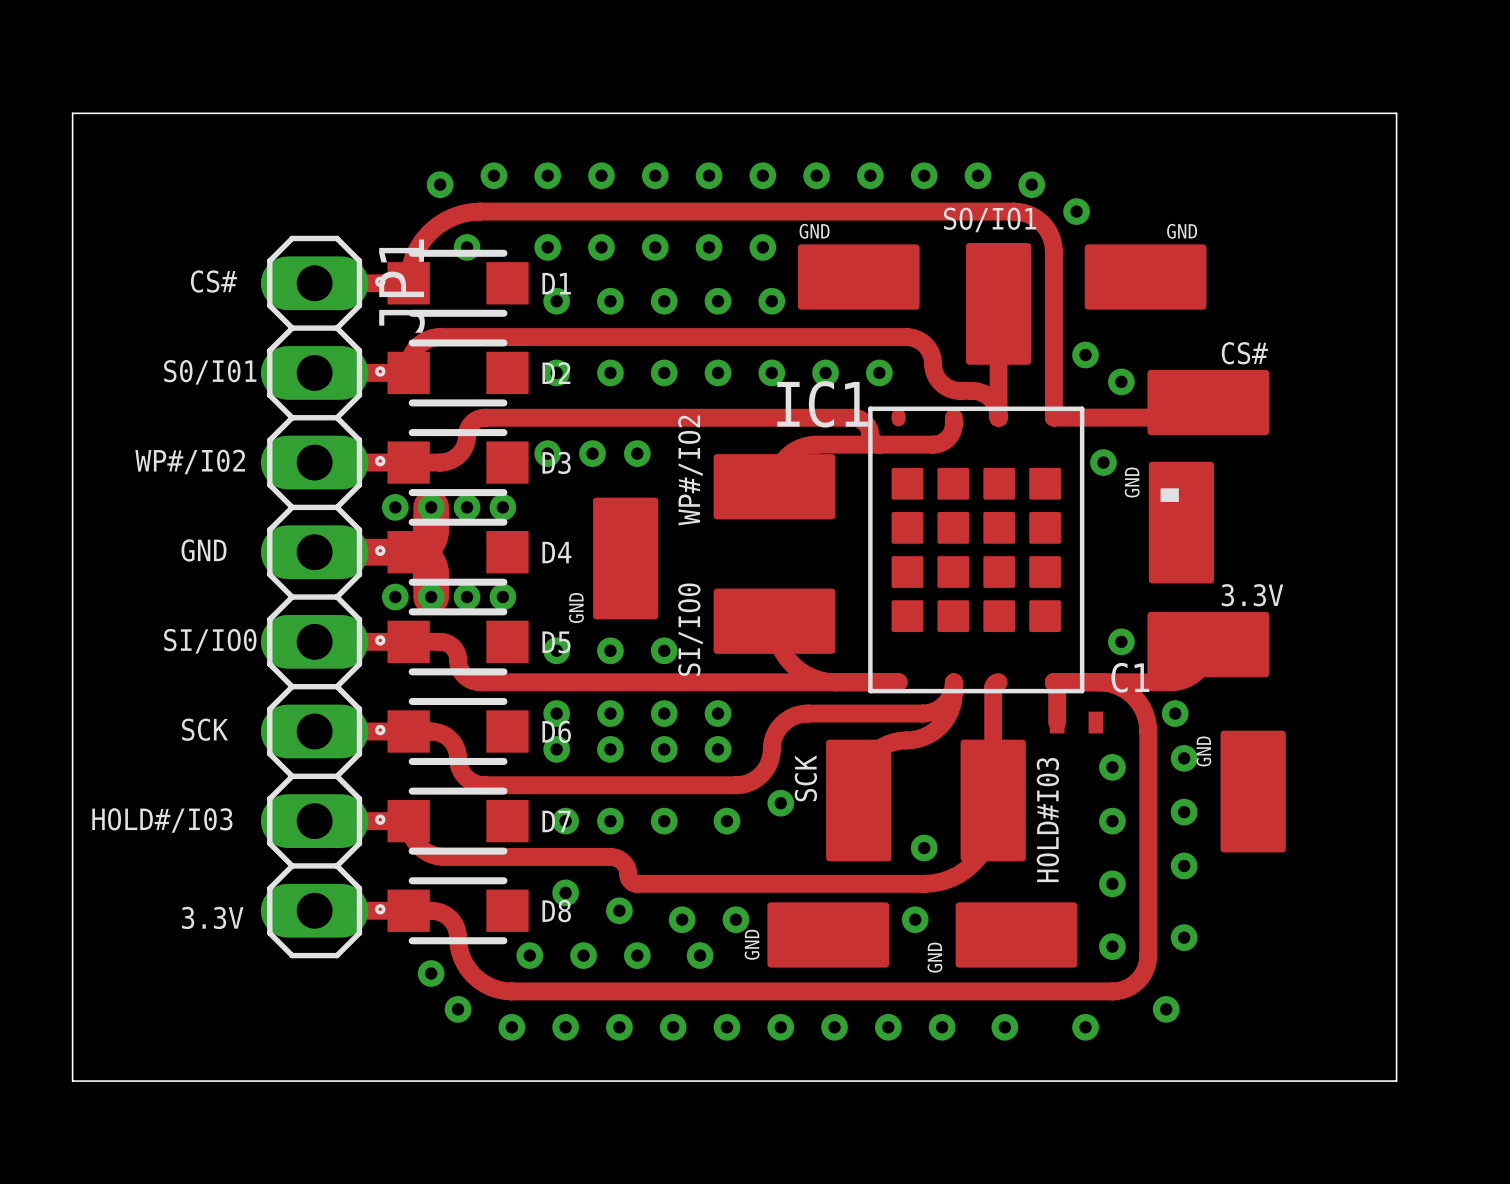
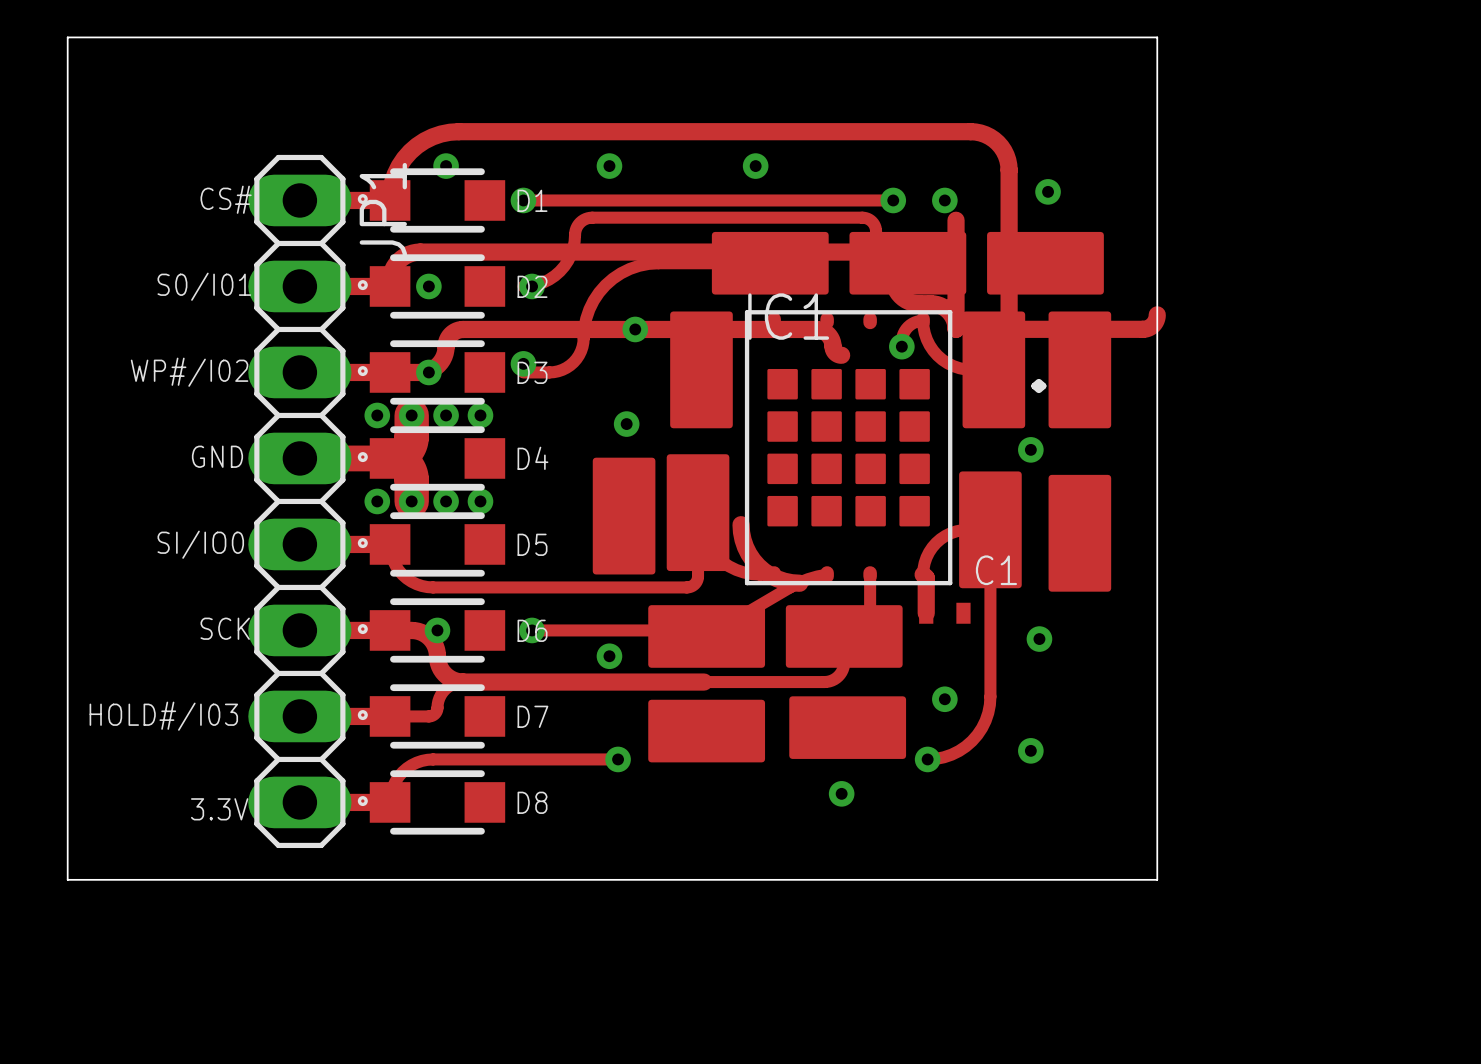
board edge: (1208, 113) (1396, 113) (1396, 1081) (72, 1081) (72, 991) -> (1157, 37) (1157, 879) (67, 879)
via: (493, 175) -> none
via: (547, 175) -> none
via: (601, 175) -> none
via: (655, 175) -> none
via: (709, 175) -> none
via: (762, 175) -> none
via: (816, 175) -> none
via: (870, 175) -> none
via: (924, 175) -> none
via: (977, 175) -> none
via: (440, 184) -> none
via: (1031, 184) -> none
via: (1076, 211) -> none
text: SO/IO1 (990, 219) -> none
text: GND (814, 231) -> none
text: GND (1182, 231) -> none
via: (547, 247) -> none
via: (601, 247) -> none
via position: (655, 247) -> (609, 166)
via: (709, 247) -> none
via position: (762, 247) -> (755, 166)
via: none -> (1048, 191)
part: (858, 277) -> none
part: (1145, 277) -> none
text position: CS# (214, 281) -> CS# (226, 199)
track: none -> (523, 200) (893, 200)
via: none -> (893, 200)
via: none -> (944, 200)
via position: (556, 301) -> (523, 200)
via: (610, 301) -> none
via: (664, 301) -> none
via: (718, 301) -> none
via: (771, 301) -> none
part: (998, 303) -> none
track: none -> (770, 263) (658, 263) (629, 268) (612, 278) (593, 300) (586, 318) (582, 346) (573, 362) (558, 371) (523, 372)
part: none -> (770, 263)
part: none -> (907, 263)
part: none -> (1045, 263)
text: CS# (1244, 353) -> none
via: (1085, 355) -> none
track: none -> (870, 275) (873, 270) (884, 269) (889, 263) (907, 263) (895, 260) (885, 253) (878, 243) (874, 224) (865, 218) (592, 217) (583, 219) (577, 226) (571, 254) (559, 271) (543, 282) (523, 286)
via: none -> (428, 286)
via: (610, 372) -> none
via: (664, 372) -> none
via: (718, 372) -> none
via: (771, 372) -> none
via: (825, 372) -> none
via: (879, 372) -> none
via: (1121, 381) -> none
part: (1208, 402) -> none
via: none -> (635, 329)
track: (953, 417) (953, 429) (949, 436) (943, 441) (935, 444) (816, 444) (800, 447) (783, 461) (775, 475) (774, 486) -> none
track: none -> (901, 346) (902, 336) (906, 329) (914, 322) (923, 320) (924, 333) (929, 345) (942, 359) (953, 366) (965, 369) (993, 369)
via: none -> (901, 346)
via: (592, 453) -> none
via: (637, 453) -> none
part: none -> (993, 369)
part: none -> (1079, 369)
via: none -> (428, 372)
via: (1103, 462) -> none
text: WP#/IO2 (690, 470) -> none
text: GND (1132, 482) -> none
part rotation: 0° (774, 486) -> 90° clockwise (701, 369)
via: none -> (626, 424)
part: (1181, 522) -> none
via: none -> (1030, 449)
IC1 position: (976, 549) -> (848, 447)
text position: GND (204, 550) -> GND (217, 456)
part: (625, 558) -> none
text: 3.3V (1252, 595) -> none
text: GND (576, 608) -> none
part: none -> (624, 516)
part rotation: 0° (774, 621) -> 90° clockwise (698, 512)
part: none -> (990, 529)
text: SI/IO0 (690, 629) -> none
part: none -> (1079, 533)
track: (408, 641) (440, 641) (449, 644) (456, 652) (458, 665) (462, 673) (469, 679) (477, 682) (898, 682) -> (390, 544) (391, 555) (398, 570) (411, 581) (427, 587) (688, 587) (694, 584) (697, 577) (698, 512) (702, 536) (710, 550) (722, 561) (744, 572) (774, 574)
via: (1121, 641) -> none
track: (1208, 644) (1205, 658) (1200, 667) (1193, 674) (1180, 681) (1053, 682) -> none
part: (1208, 644) -> none
via: (556, 650) -> none
via: (610, 650) -> none
via: (664, 650) -> none
track: none -> (827, 574) (798, 582) (706, 636) (704, 632) (700, 630) (532, 630)
track: (998, 682) (994, 683) (993, 687) (993, 814) (990, 832) (983, 849) (972, 863) (958, 874) (942, 881) (924, 883) (636, 883) (629, 879) (624, 863) (612, 857) (435, 855) (426, 852) (416, 842) (411, 834) (408, 821) -> (463, 682) (453, 684) (445, 689) (439, 697) (436, 711) (432, 715) (390, 716)
track: (1099, 682) (1117, 686) (1133, 696) (1144, 712) (1147, 725) (1147, 960) (1145, 969) (1137, 980) (1121, 990) (504, 990) (484, 984) (469, 970) (459, 951) (456, 927) (447, 916) (434, 910) (408, 910) -> (618, 759) (427, 759) (411, 765) (398, 776) (391, 791) (390, 802)
track: (1057, 685) (1057, 722) -> none
via: (556, 713) -> none
via: (610, 713) -> none
via: (664, 713) -> none
via: (718, 713) -> none
via: (1175, 713) -> none
track: none -> (927, 614) (926, 577) (923, 574) (923, 568) (926, 557) (932, 547) (940, 539) (956, 531) (990, 529) (990, 696) (988, 712) (977, 734) (965, 746) (951, 754) (927, 759)
C1 position: (1076, 722) -> (944, 613)
text position: SCK (205, 729) -> SCK (225, 628)
via: none -> (437, 630)
via: none -> (532, 630)
part: none -> (706, 636)
part: none -> (844, 636)
via: (556, 749) -> none
via: (610, 749) -> none
via: (664, 749) -> none
via: (718, 749) -> none
text: GND (1203, 751) -> none
via: none -> (609, 656)
via: (1184, 758) -> none
via position: (1112, 767) -> (1039, 639)
text: SCK (805, 778) -> none
track: (735, 785) (749, 782) (764, 771) (770, 758) (773, 740) (776, 731) (785, 720) (793, 716) (807, 713) (930, 712) (941, 707) (947, 701) (951, 694) (953, 682) (952, 705) (947, 716) (939, 726) (930, 734) (918, 738) (888, 744) (877, 750) (868, 759) (860, 775) (858, 800) -> (704, 682) (824, 682) (834, 679) (840, 674) (843, 667) (844, 636) (859, 631) (868, 620) (870, 610) (870, 574)
part: (1253, 791) -> none
part: (858, 800) -> none
part: (993, 800) -> none
via: (780, 803) -> none
via: none -> (944, 699)
via: (1184, 812) -> none
text: HOLD#I03 (1047, 820) -> none
via: (565, 821) -> none
via: (610, 821) -> none
via: (664, 821) -> none
via: (726, 821) -> none
via: (1112, 821) -> none
part: none -> (847, 727)
part: none -> (706, 731)
via: (924, 848) -> none
via: none -> (1030, 750)
via: none -> (618, 759)
via: none -> (927, 759)
via: (1184, 865) -> none
via: (1112, 883) -> none
via: (565, 892) -> none
via: none -> (841, 793)
via: (619, 910) -> none
text position: 3.3V (212, 917) -> 3.3V (219, 809)
via: (682, 919) -> none
via: (735, 919) -> none
via: (915, 919) -> none
part: (828, 934) -> none
part: (1016, 934) -> none
via: (1184, 937) -> none
text: GND (752, 944) -> none
via: (1112, 946) -> none
via: (529, 955) -> none
via: (583, 955) -> none
via: (637, 955) -> none
via: (700, 955) -> none
text: GND (934, 957) -> none
via: (431, 973) -> none
via: (458, 1009) -> none
via: (1166, 1009) -> none
via: (511, 1027) -> none
via: (565, 1027) -> none
via: (619, 1027) -> none
via: (673, 1027) -> none
via: (726, 1027) -> none
via: (780, 1027) -> none
via: (834, 1027) -> none
via: (888, 1027) -> none
via: (942, 1027) -> none
via: (1004, 1027) -> none
via: (1085, 1027) -> none

